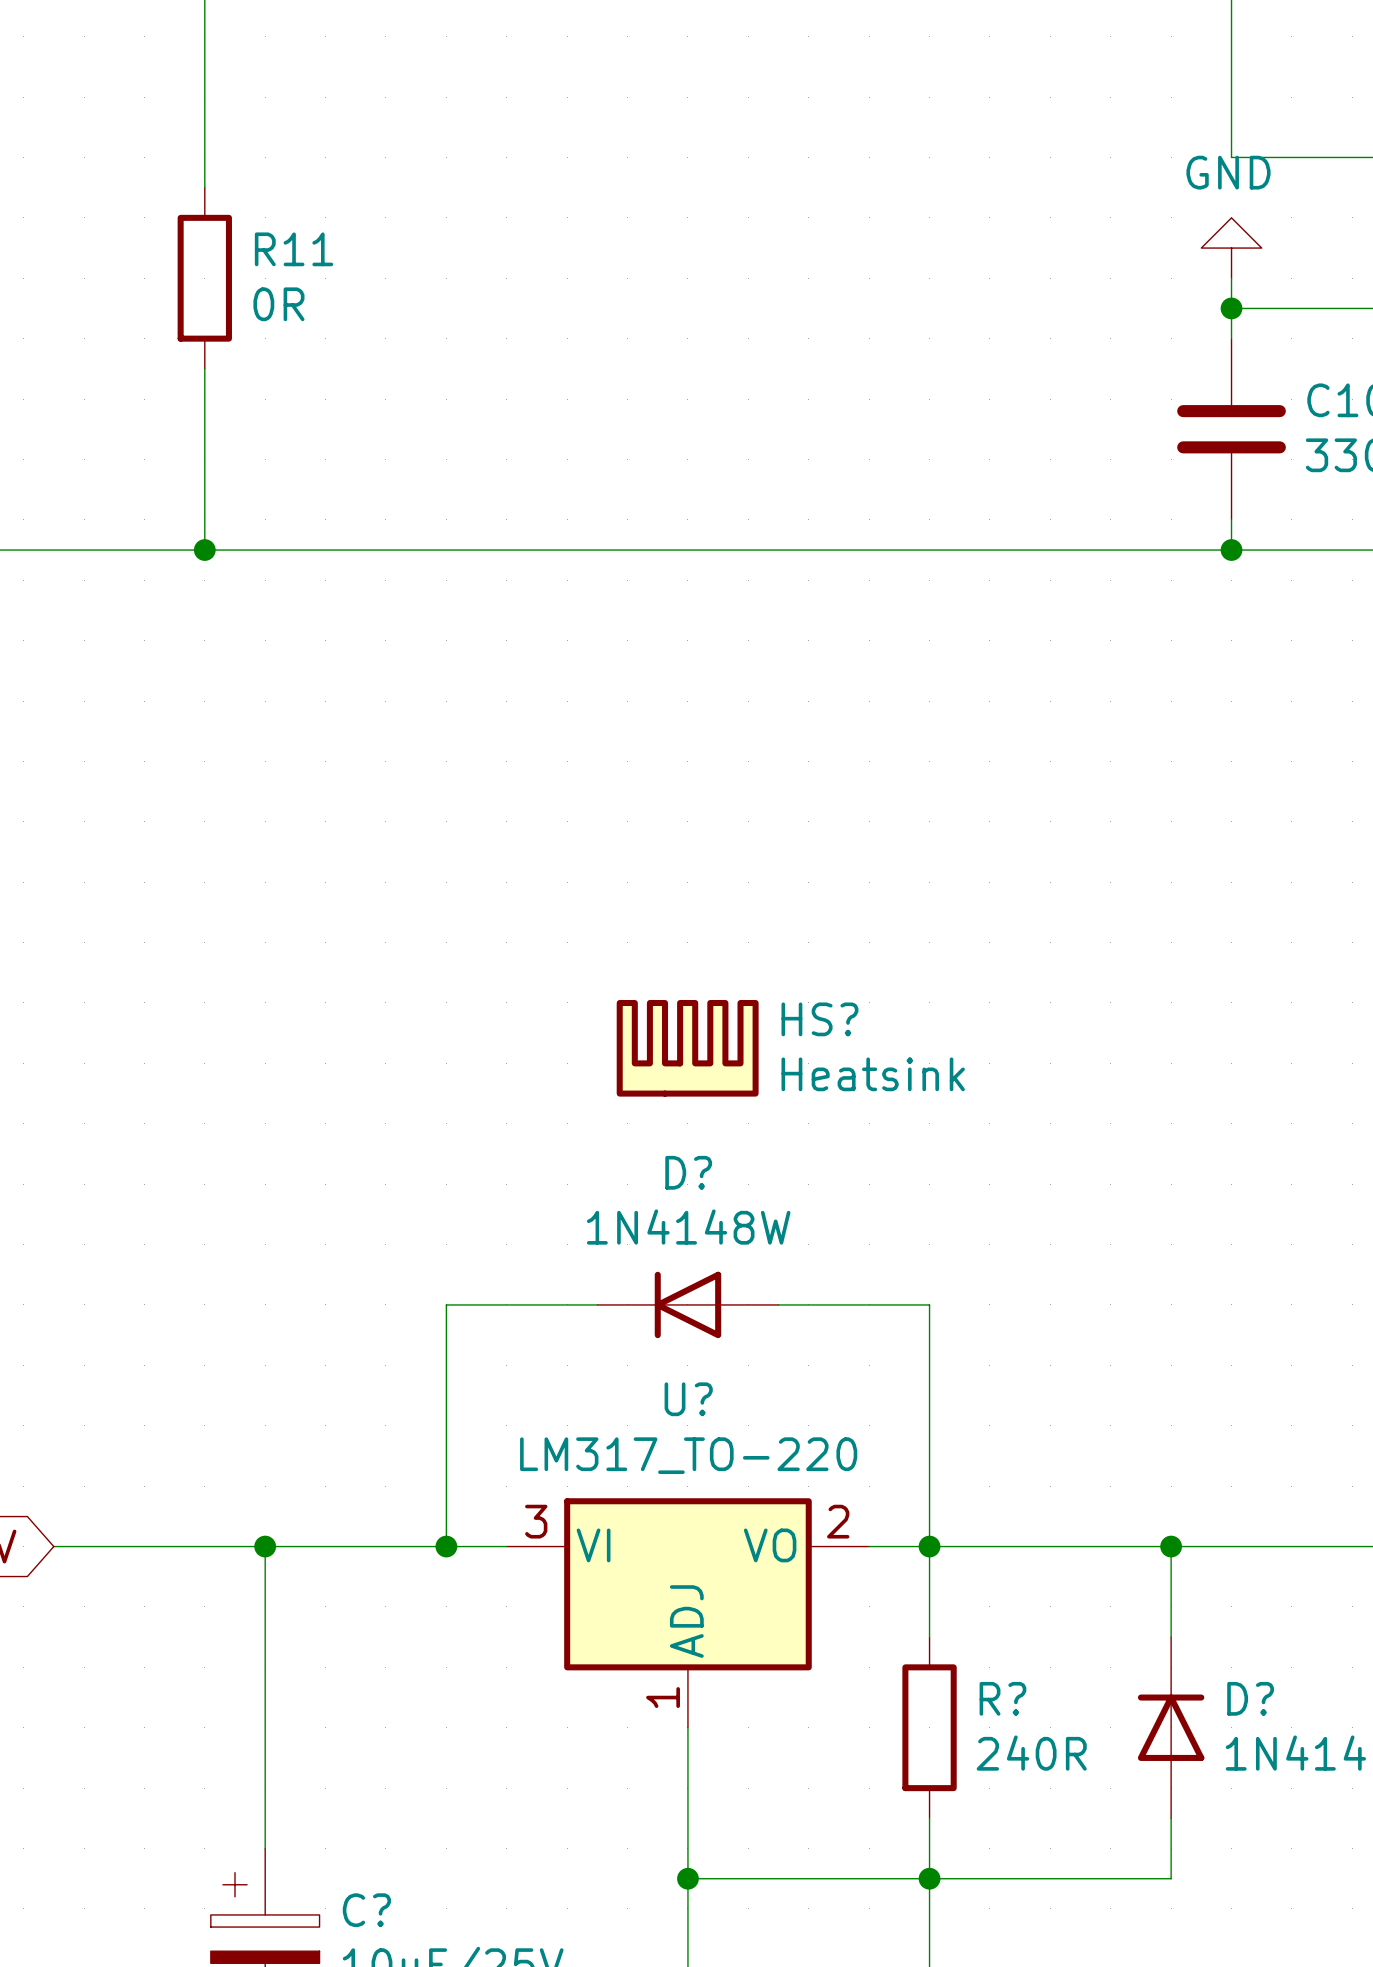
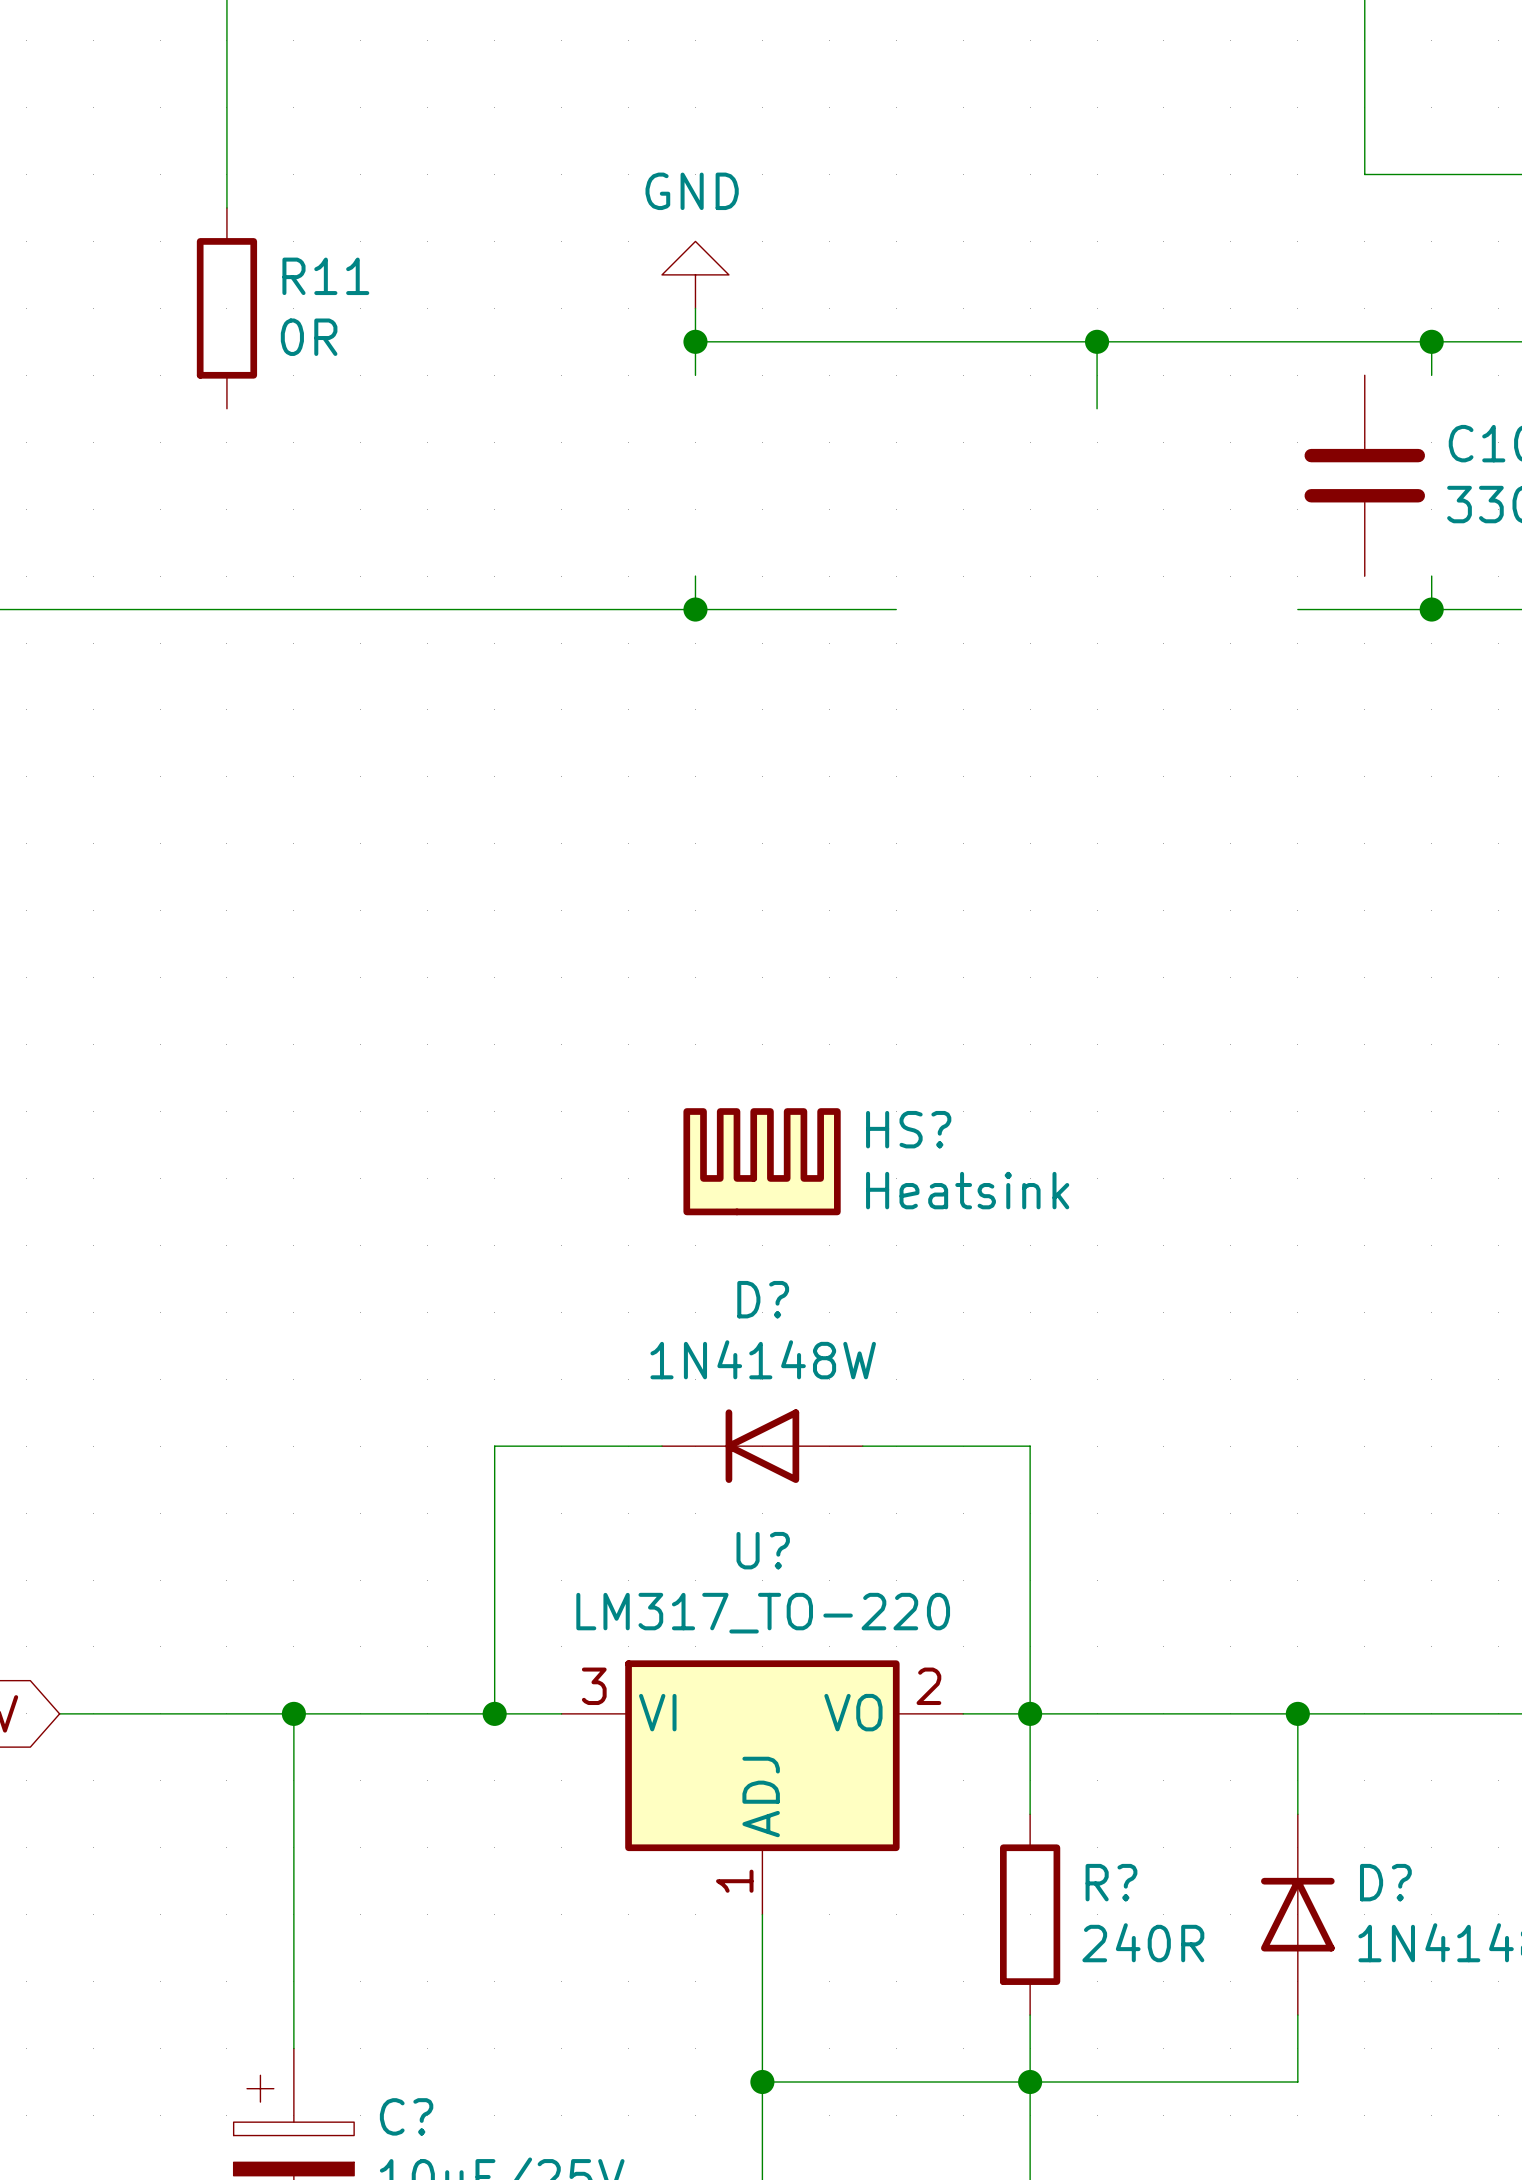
power symbol: none -> GND (695, 274)
power symbol: GND (1231, 248) -> none
wire: none -> (695, 308) (695, 375)
wire: (1231, 278) (1231, 338) -> (1097, 341) (1097, 408)
wire: none -> (695, 341) (1364, 341)
junction: none -> (695, 341)
junction: none -> (1097, 341)
junction position: (1231, 308) -> (1431, 341)
wire: none -> (1431, 341) (1431, 375)
wire: (204, 368) (204, 550) -> none
wire: none -> (695, 576) (695, 609)
wire: (1231, 519) (1231, 550) -> (1431, 576) (1431, 609)
junction: (204, 550) -> none
junction: none -> (695, 609)
wire: (808, 550) (1171, 550) -> none
junction position: (1231, 550) -> (1431, 609)

